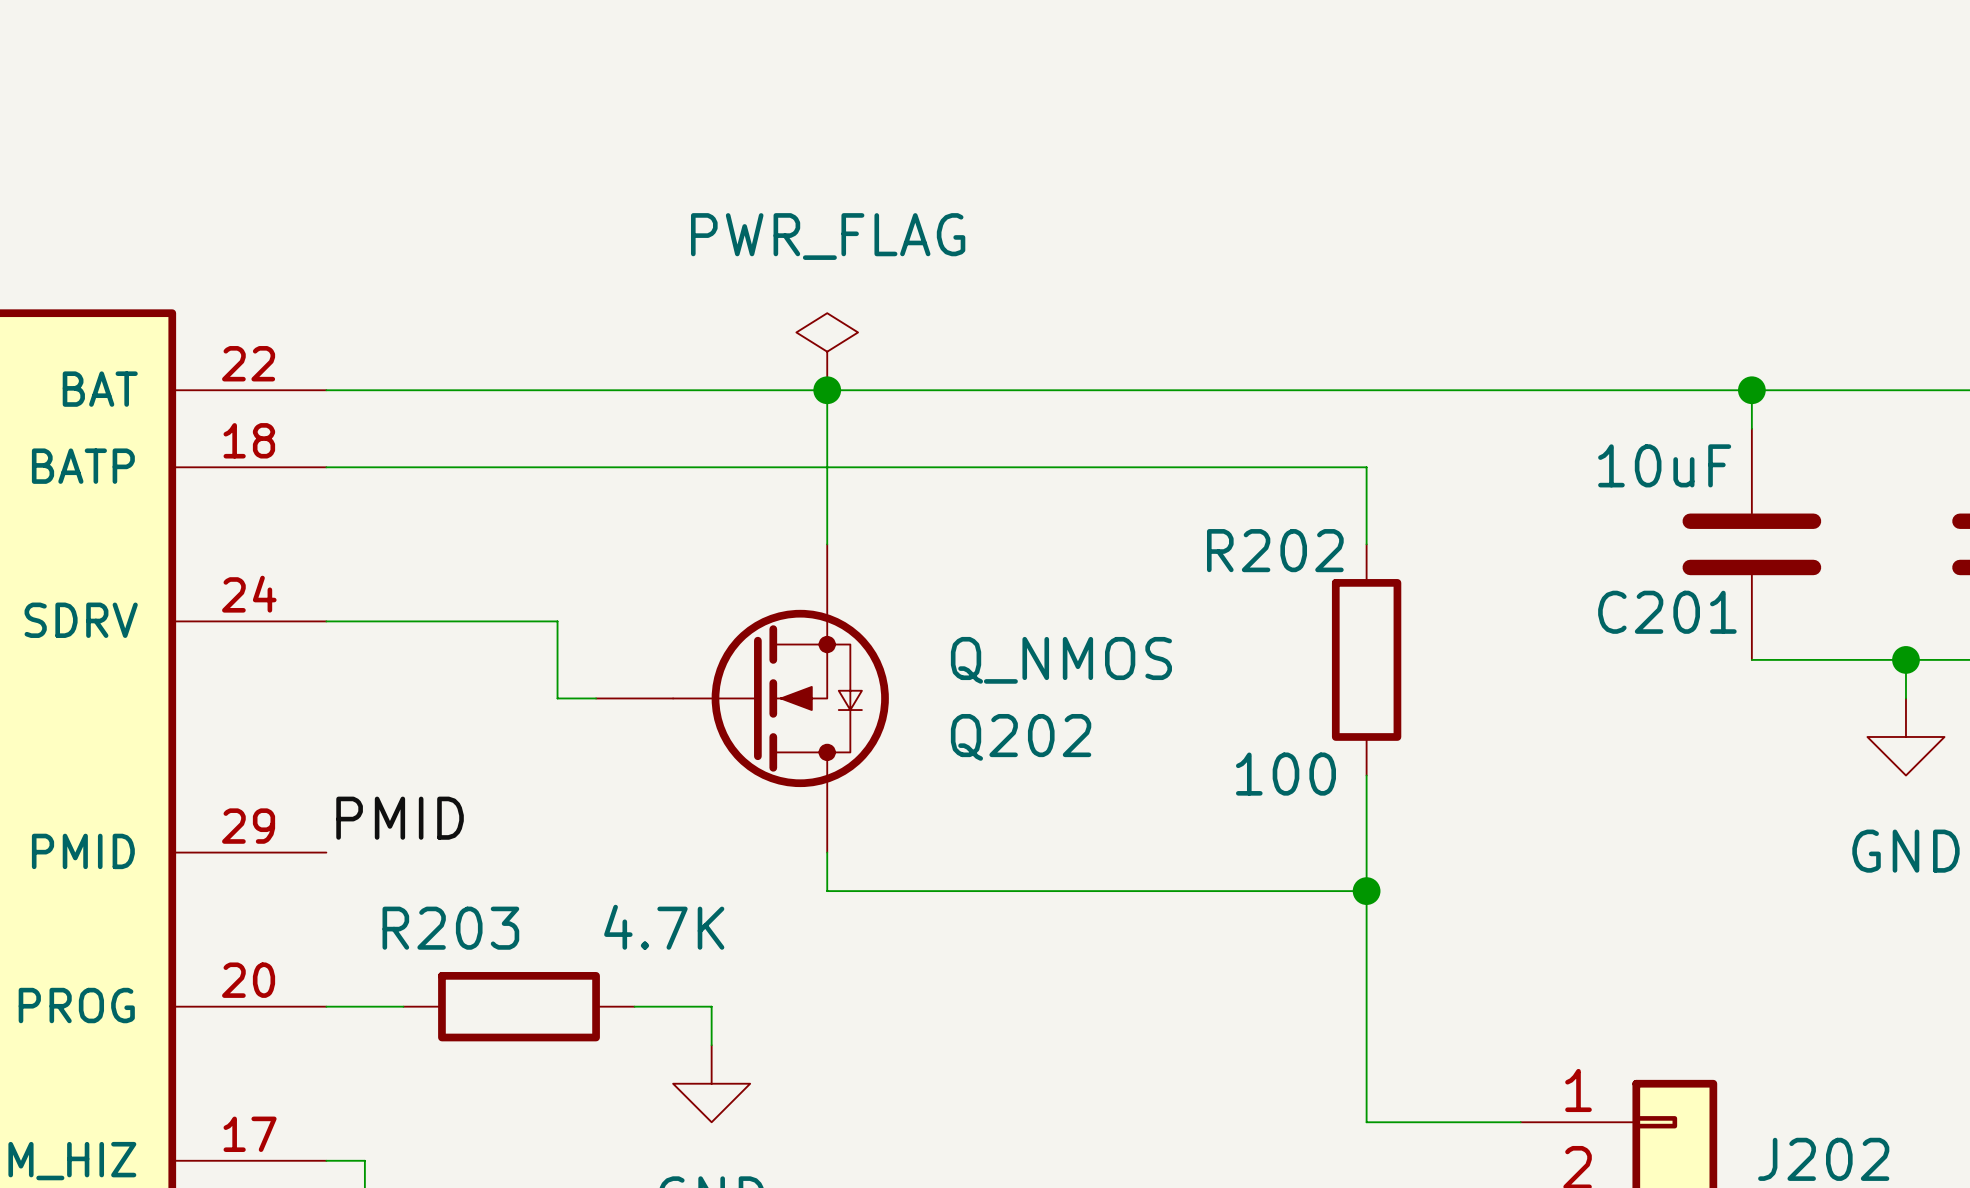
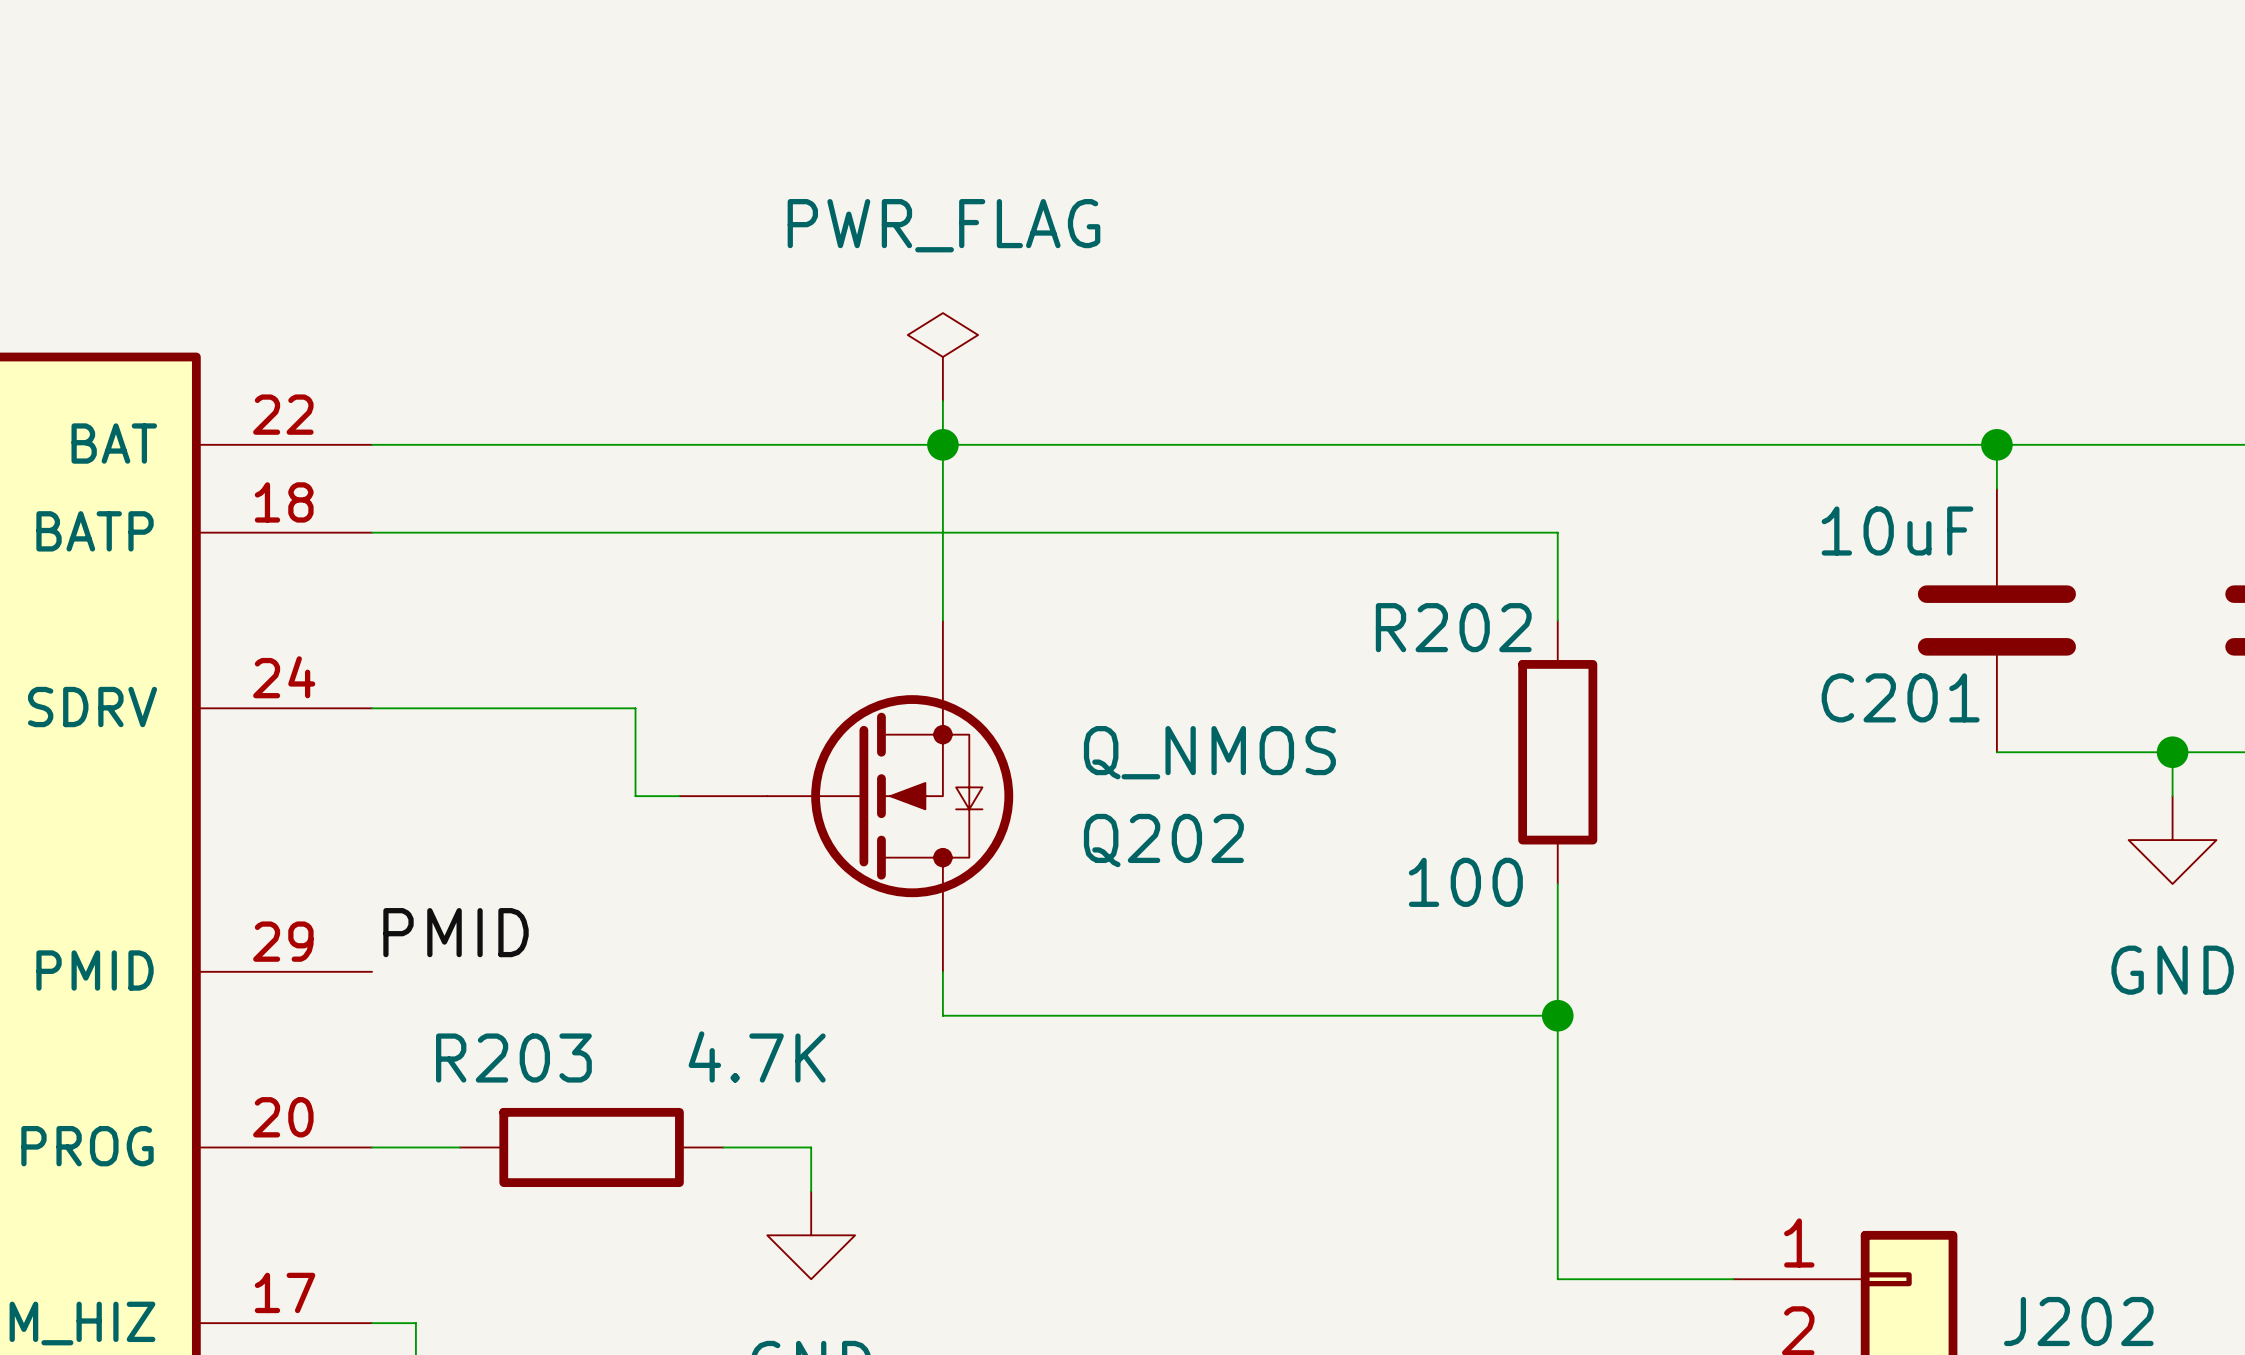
power symbol position: PWR_FLAG (827, 351) -> PWR_FLAG (942, 357)

